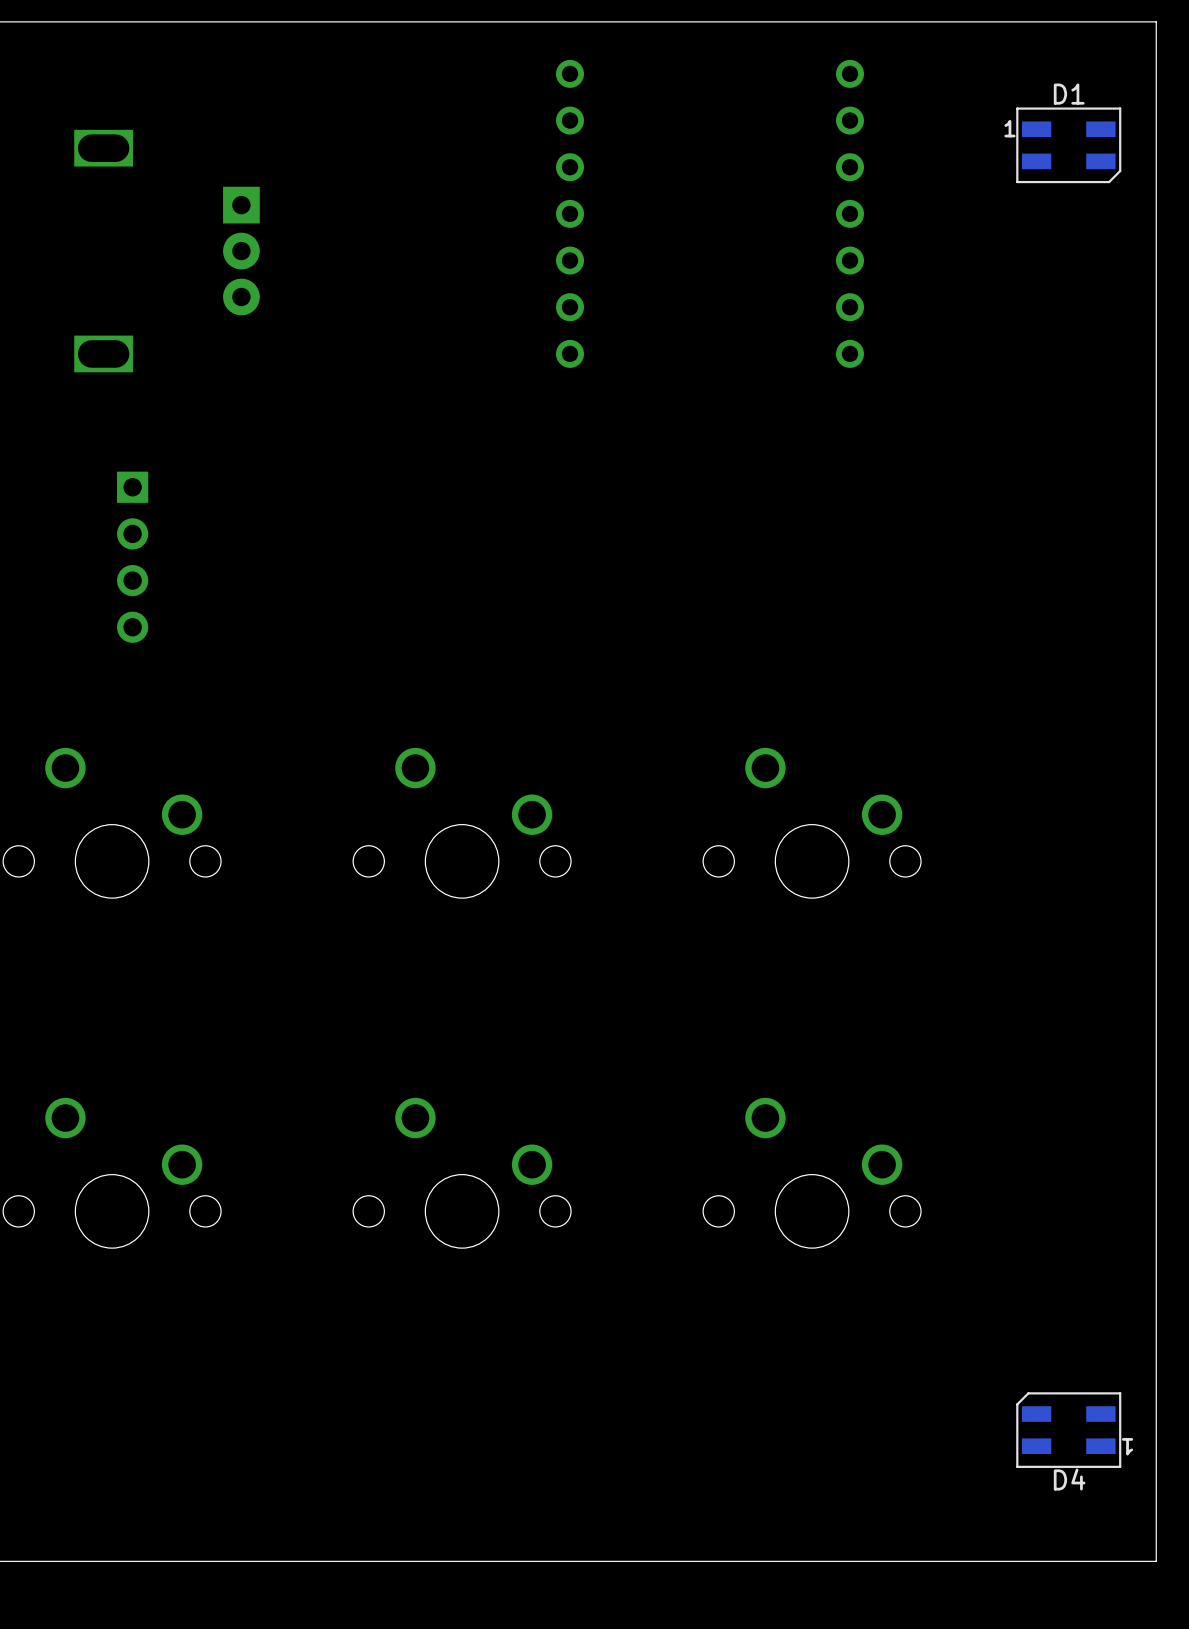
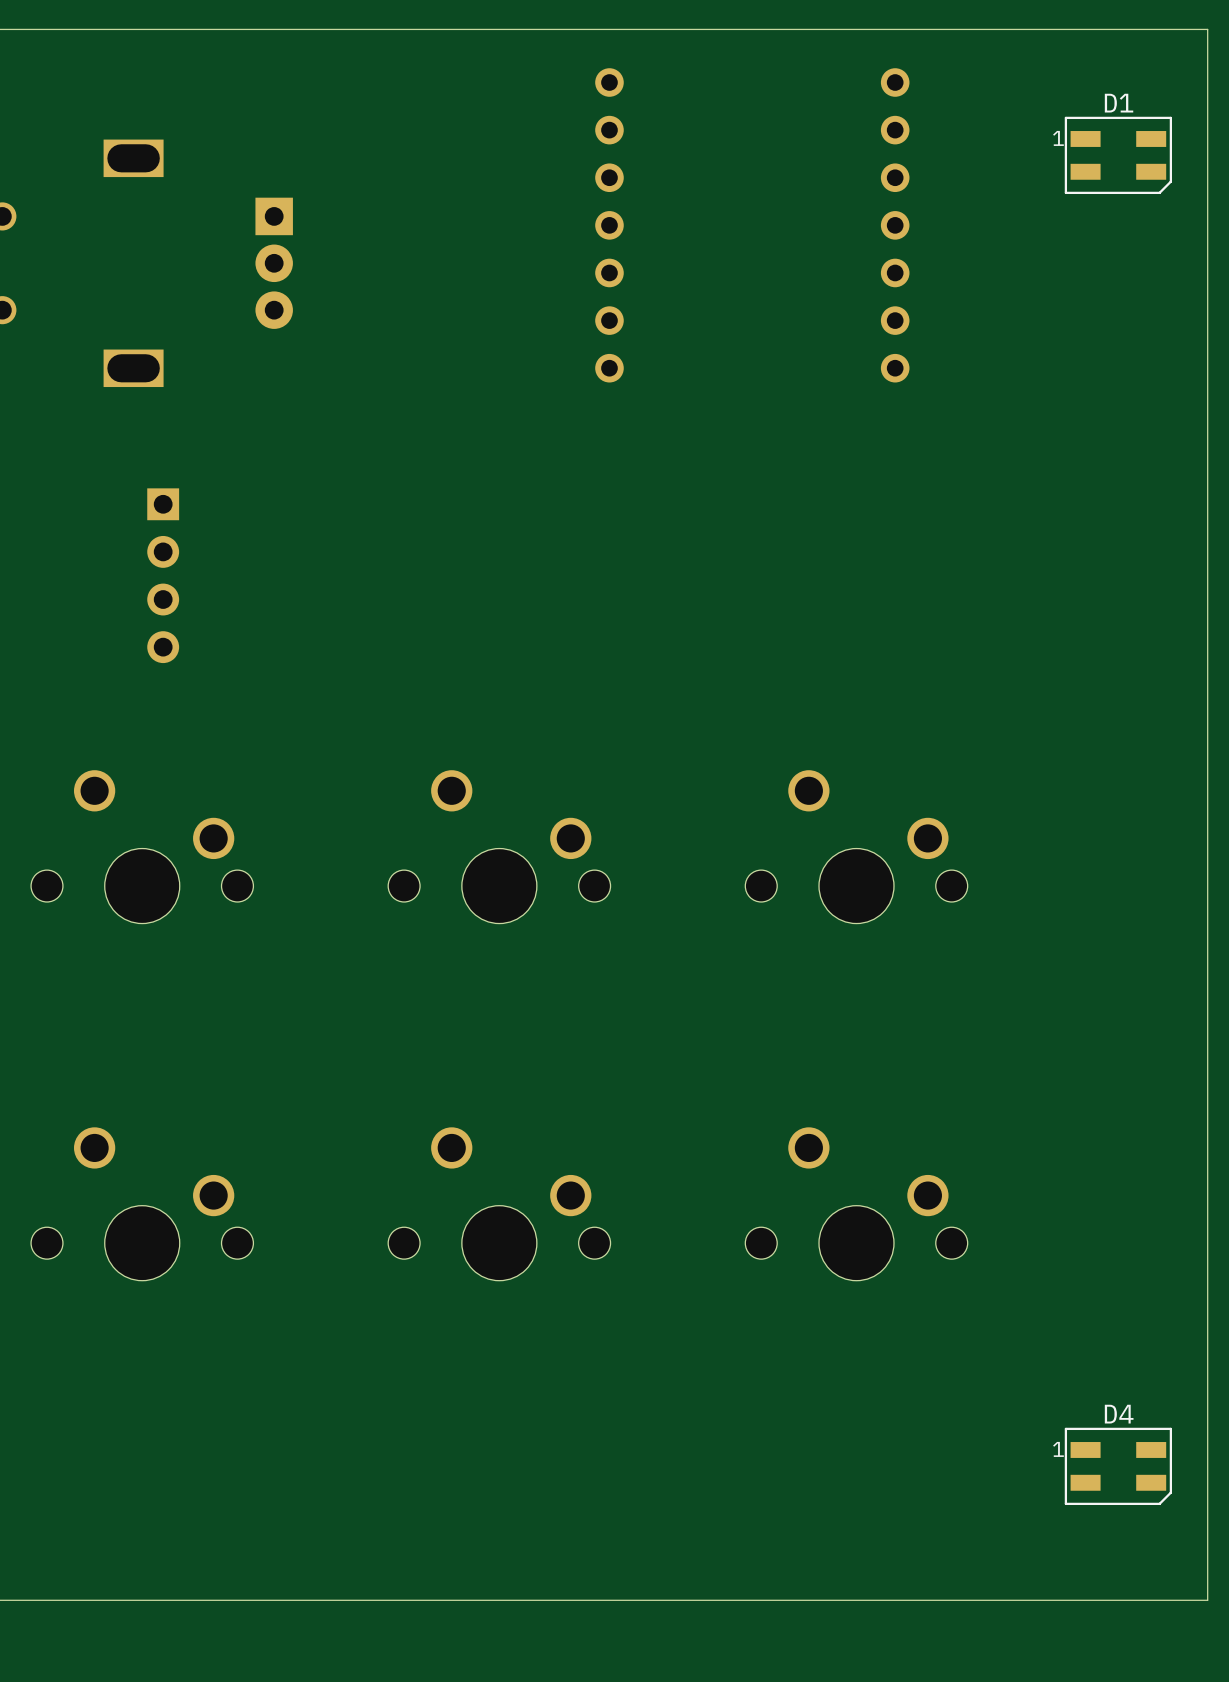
D4 rotation: 0° (1068, 1430) -> 180° (1118, 1466)

